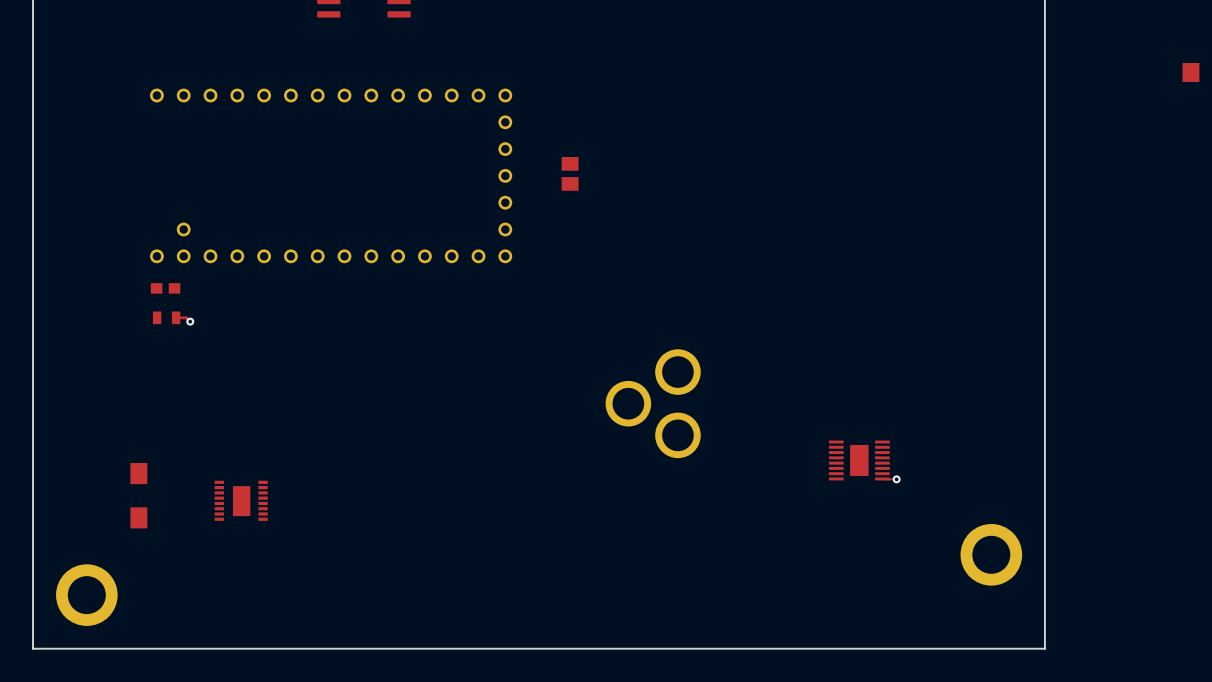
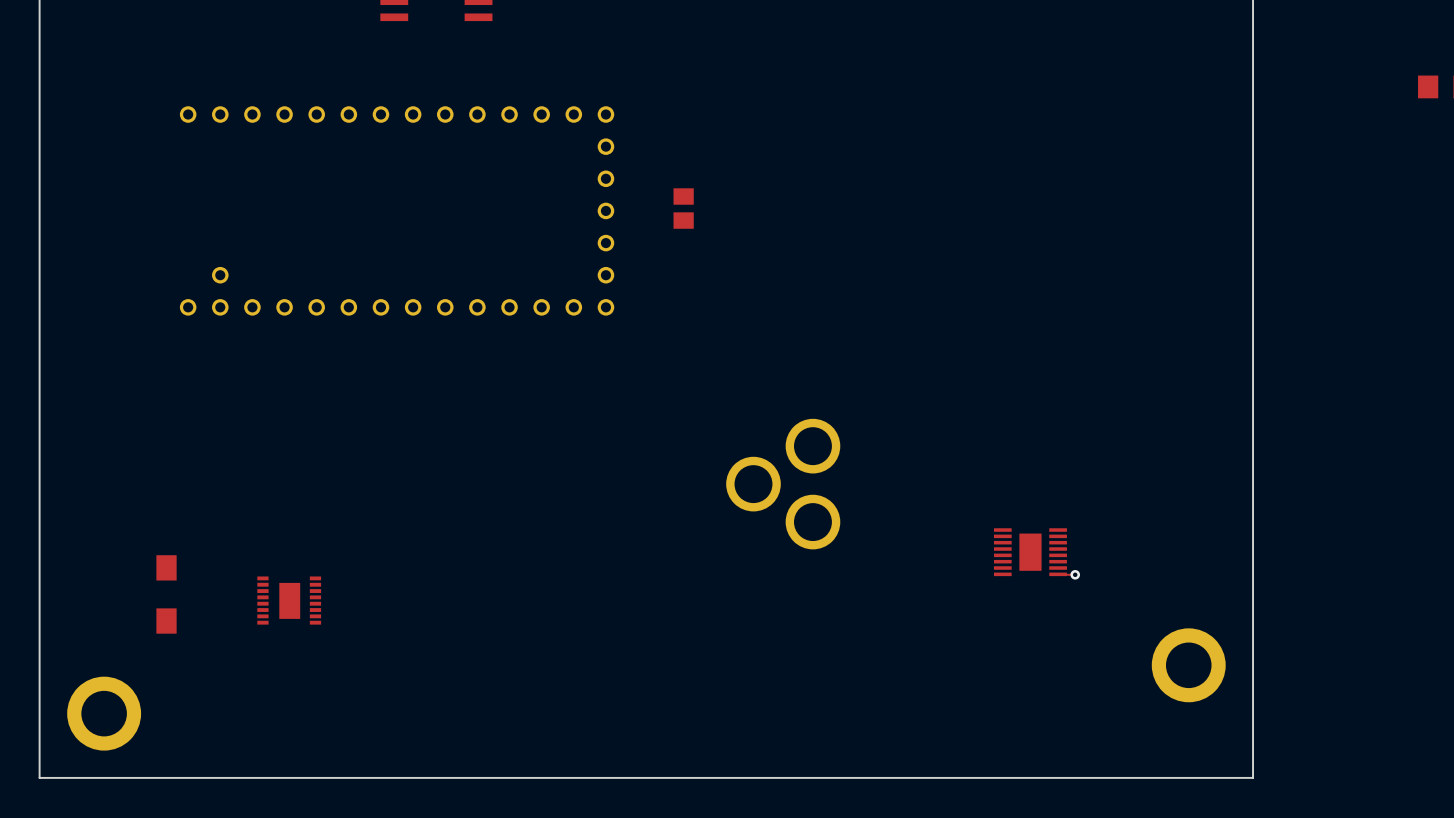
part: (165, 288) -> none
part: (166, 317) -> none
top track: (176, 317) (186, 317) (190, 321) -> none
via: (190, 321) -> none

